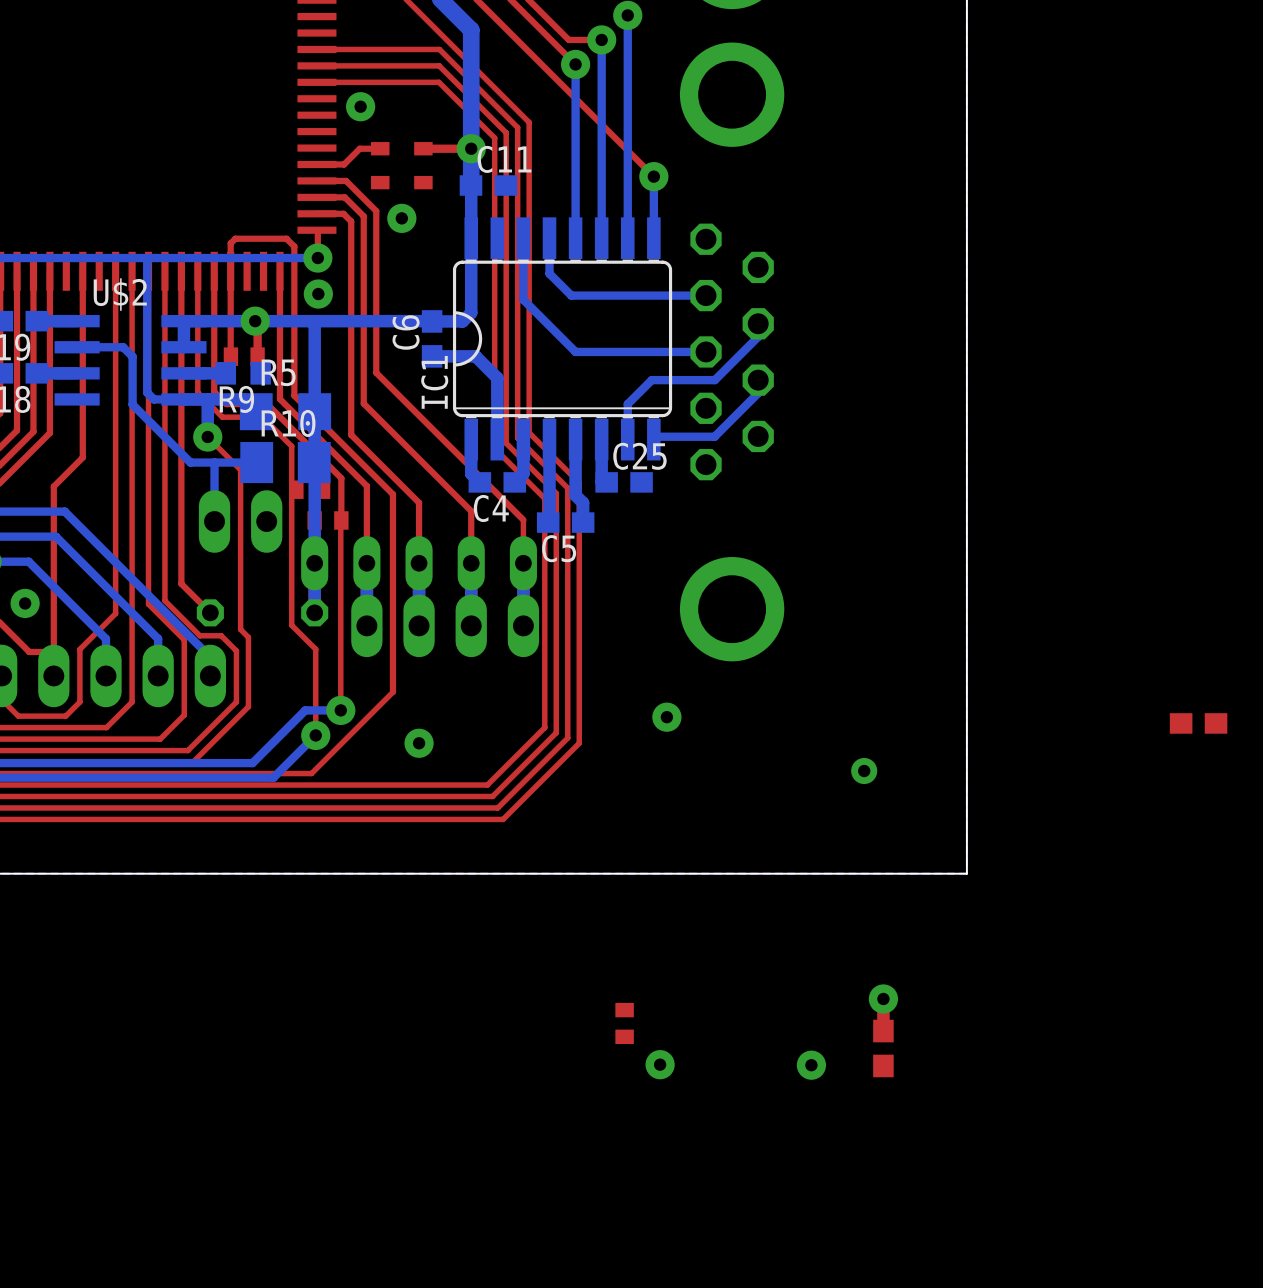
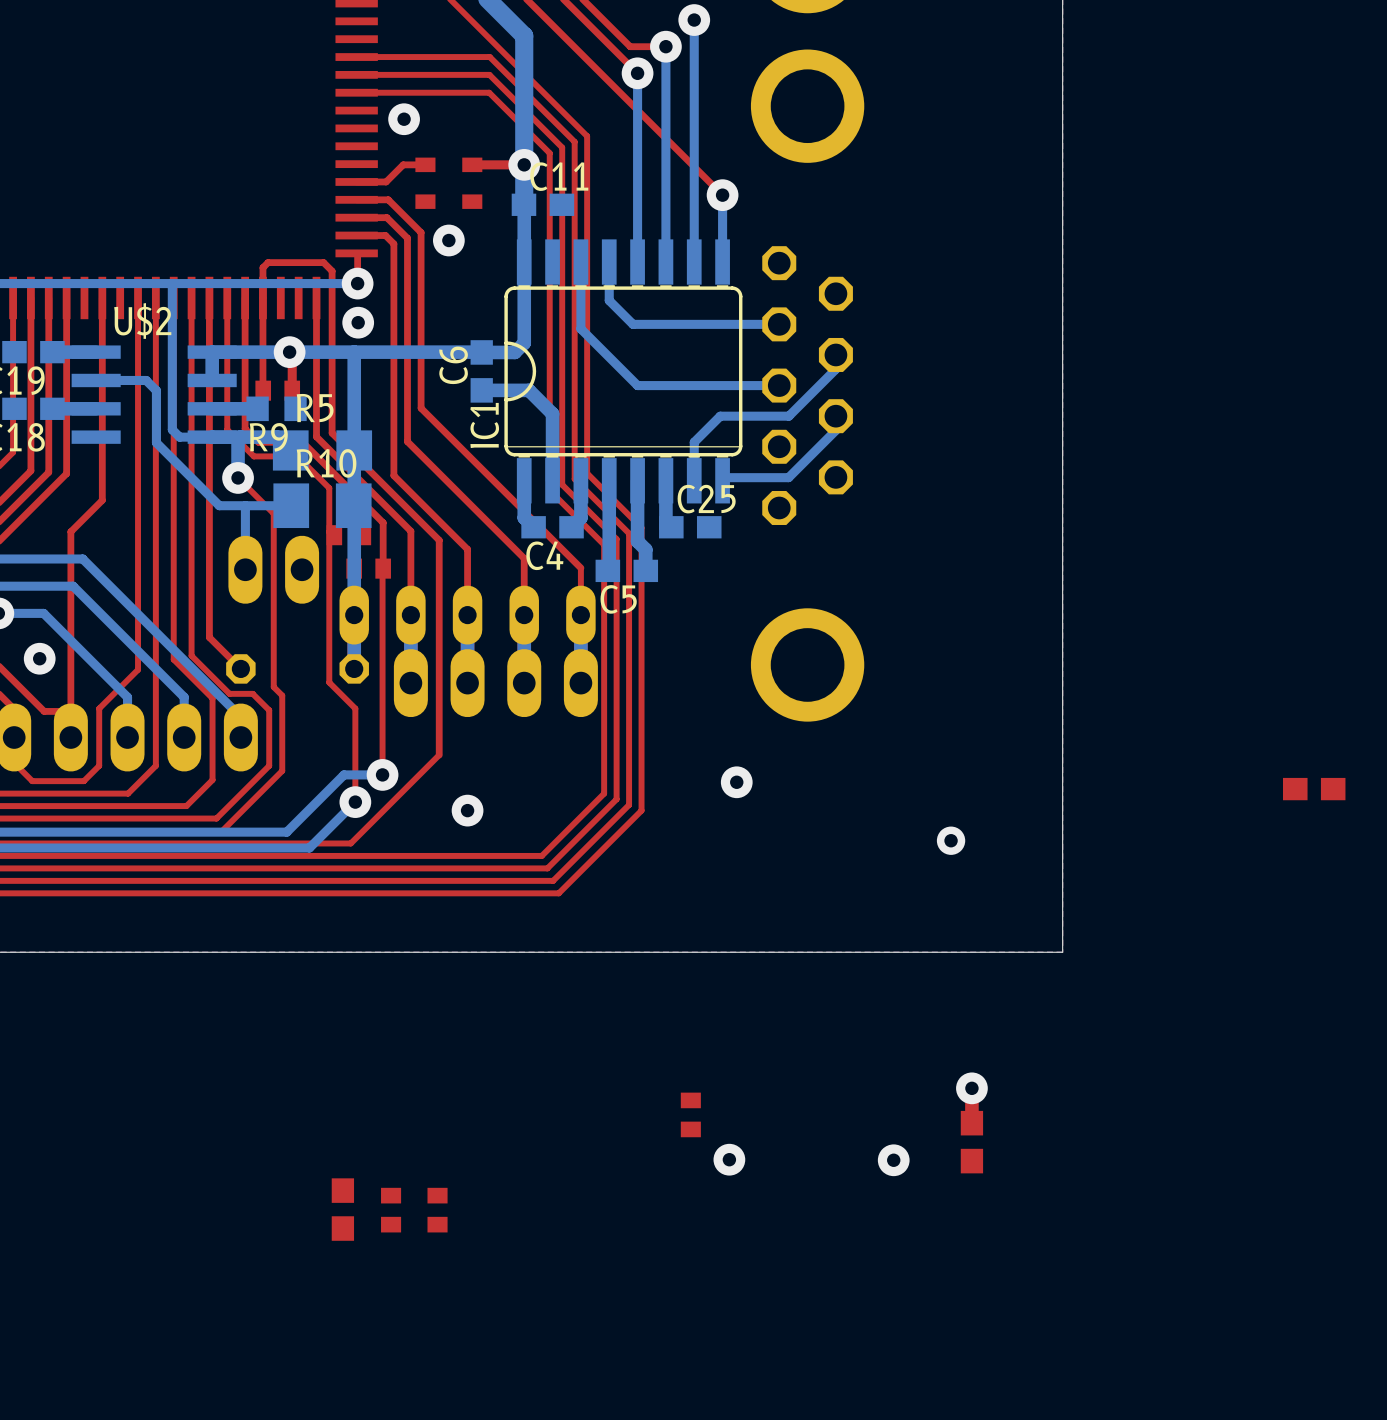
part: none -> (342, 1209)
part: none -> (391, 1210)
part: none -> (437, 1210)

